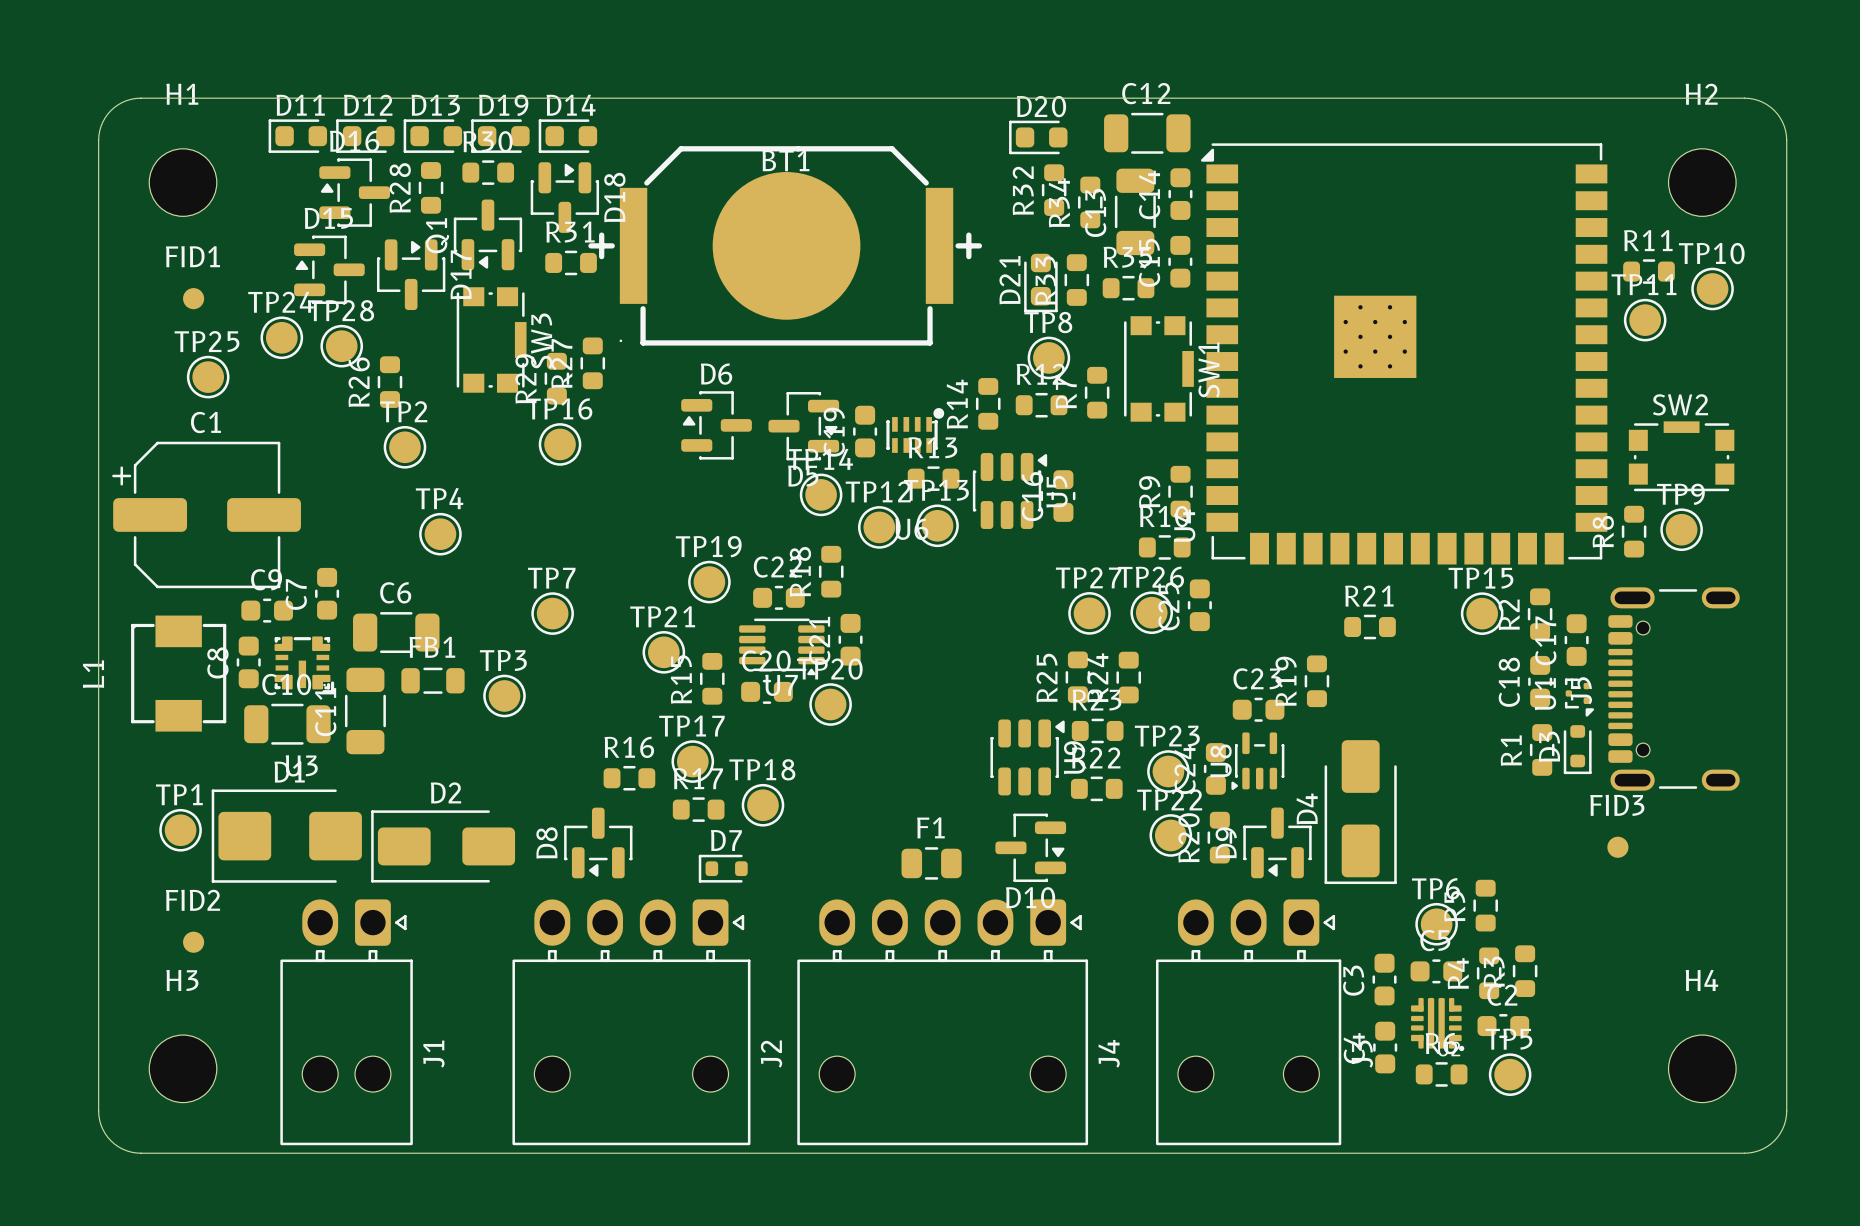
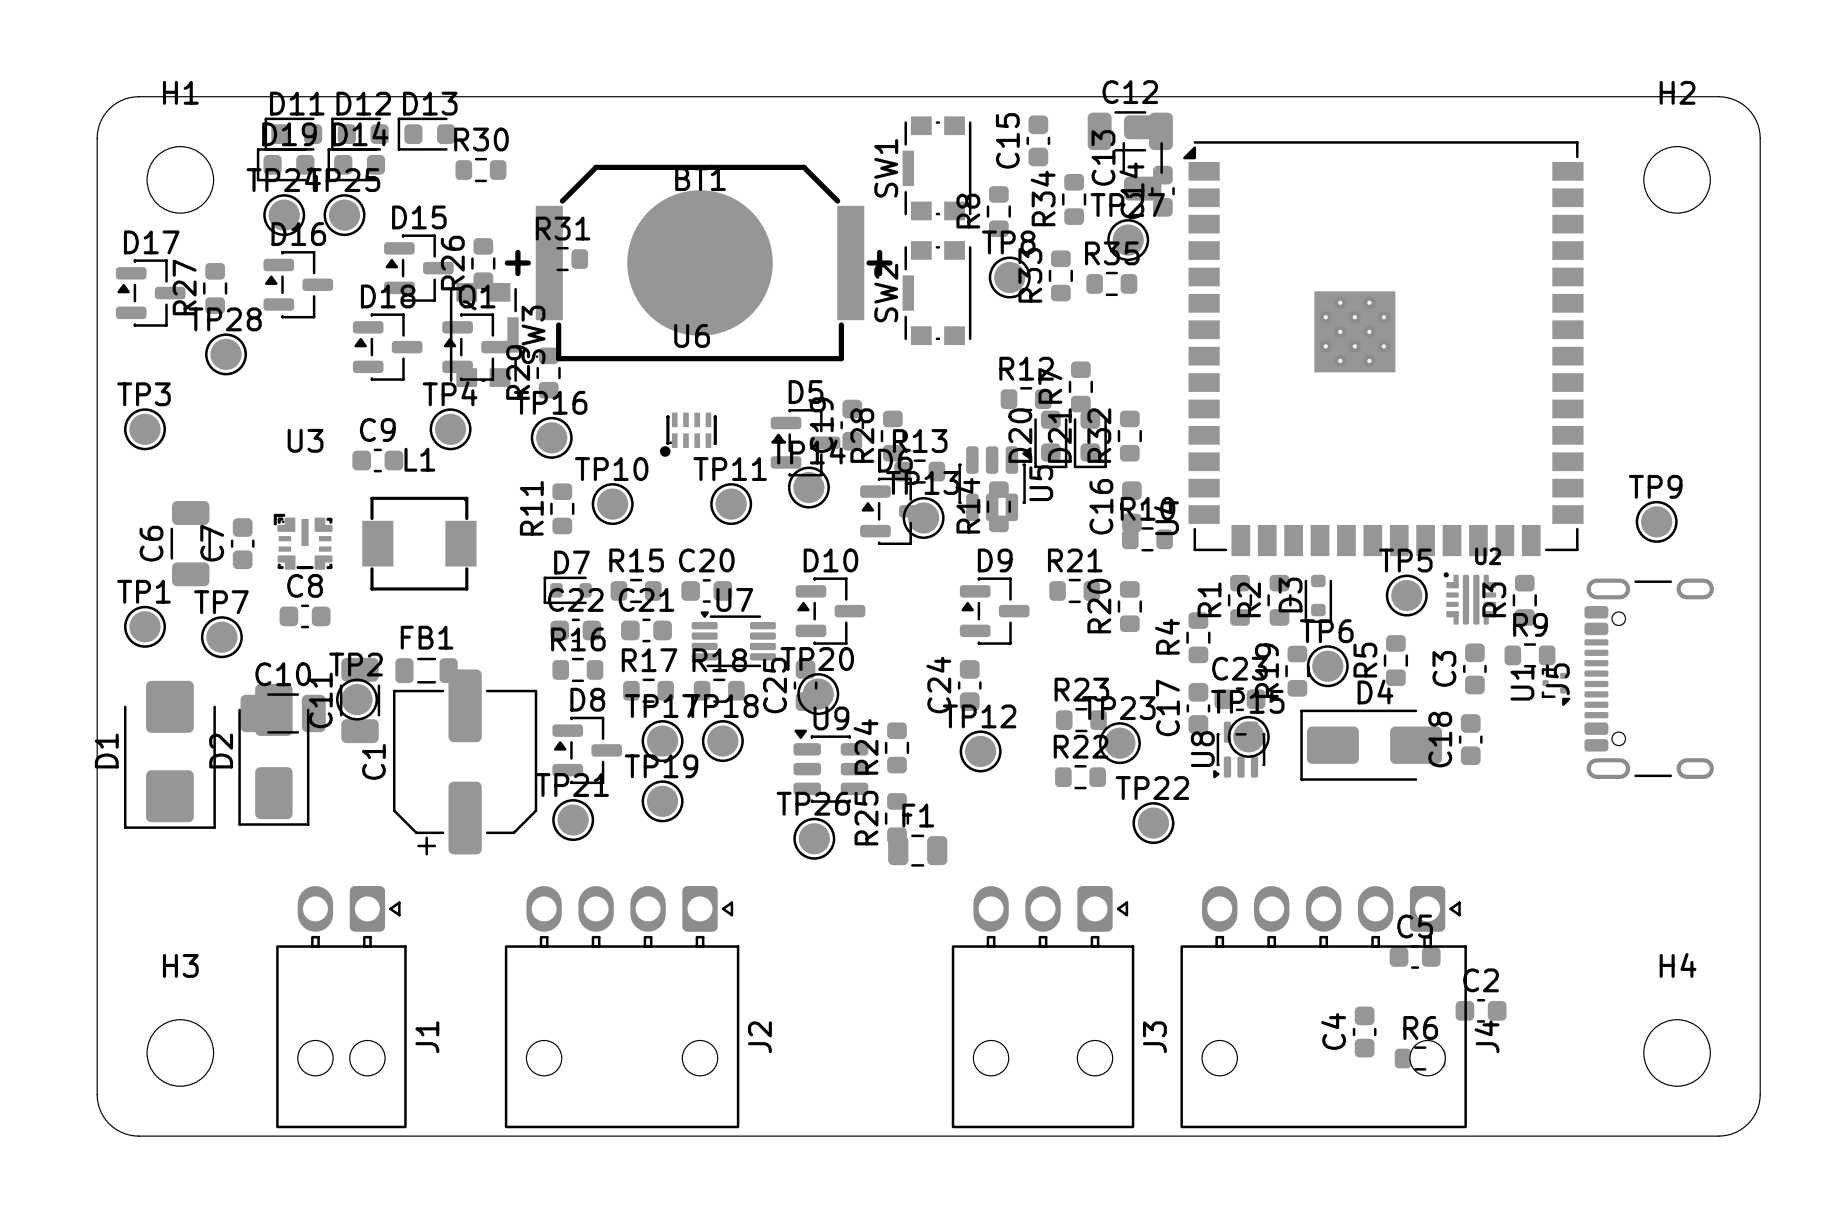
D19 position: (500, 136) -> (285, 164)
D14 position: (567, 136) -> (356, 164)
D20 rotation: 0° (1038, 137) -> 90° counterclockwise (1050, 439)
D20 position: (1038, 137) -> (1050, 439)
R28 position: (431, 187) -> (892, 436)
R32 position: (1054, 190) -> (1129, 436)
D16 position: (354, 192) -> (298, 284)
D18 rotation: 0° (564, 197) -> 90° counterclockwise (387, 347)
D18 position: (564, 197) -> (387, 347)
C13 position: (1135, 211) -> (1142, 157)
Q1 rotation: 0° (487, 234) -> 90° clockwise (477, 347)
Q1 position: (487, 234) -> (477, 347)
R11 name position: R11 (1648, 240) -> R11 (531, 508)
BT1 position: (785, 245) -> (698, 263)
C15 position: (1180, 261) -> (1038, 140)
D15 position: (329, 269) -> (418, 268)
R11 rotation: 0° (1648, 271) -> 90° clockwise (562, 508)
R11 position: (1648, 271) -> (562, 508)
D17 rotation: 0° (411, 274) -> 90° counterclockwise (150, 293)
D17 position: (411, 274) -> (150, 293)
D21 position: (1040, 283) -> (1090, 439)
TP10 position: (1712, 288) -> (612, 504)
FID1: (193, 298) -> none
TP11 position: (1645, 320) -> (731, 504)
TP24 position: (281, 337) -> (284, 215)
TP28 position: (341, 346) -> (226, 354)
TP8 position: (1048, 357) -> (1009, 277)
R27 position: (592, 363) -> (215, 288)
SW1 rotation: 0° (1158, 368) -> 180° (937, 168)
SW1 position: (1158, 368) -> (937, 168)
TP25 position: (208, 377) -> (344, 215)
R26 position: (389, 382) -> (483, 263)
R14 position: (988, 403) -> (998, 506)
C1 name position: C1 (205, 422) -> C1 (373, 761)
D6 position: (716, 425) -> (894, 511)
D5 rotation: 0° (803, 426) -> 180° (805, 442)
U6 rotation: 0° (915, 430) -> 180° (688, 434)
U6 position: (915, 430) -> (688, 434)
C1 footprint: [112, 441, 301, 589] -> [392, 669, 538, 856]
TP2 position: (404, 447) -> (357, 699)
SW2 rotation: 0° (1681, 456) -> 90° counterclockwise (937, 293)
SW2 position: (1681, 456) -> (937, 293)
R9 rotation: 0° (1180, 491) -> 90° clockwise (1529, 655)
R9 position: (1180, 491) -> (1529, 655)
C16 position: (1063, 496) -> (1131, 506)
TP12 position: (879, 527) -> (980, 751)
R8 position: (1634, 531) -> (998, 211)
TP4 position: (440, 534) -> (450, 429)
R18 rotation: 0° (831, 571) -> 90° clockwise (719, 690)
R18 position: (831, 571) -> (719, 690)
TP19 position: (709, 582) -> (662, 801)
C6 name position: C6 (395, 592) -> C6 (151, 543)
C7 position: (327, 593) -> (242, 543)
C22 position: (778, 597) -> (575, 630)
C25 position: (1199, 605) -> (805, 685)
C9 position: (267, 610) -> (377, 460)
TP26 position: (1151, 612) -> (814, 838)
TP7 position: (552, 613) -> (221, 637)
TP27 position: (1089, 613) -> (1128, 240)
TP15 position: (1482, 613) -> (1248, 736)
R2 position: (1540, 614) -> (1279, 600)
R21 position: (1370, 627) -> (1074, 590)
C6 rotation: 0° (396, 632) -> 90° clockwise (190, 543)
C6 position: (396, 632) -> (190, 543)
C21 rotation: 0° (850, 639) -> 90° clockwise (646, 630)
C21 position: (850, 639) -> (646, 630)
C17 position: (1576, 640) -> (1198, 708)
U7 rotation: 0° (781, 646) -> 180° (733, 639)
TP21 position: (663, 652) -> (573, 820)
C8 rotation: 0° (248, 662) -> 90° clockwise (305, 616)
C8 position: (248, 662) -> (305, 616)
U3 rotation: 0° (304, 664) -> 180° (303, 541)
U3 position: (304, 664) -> (303, 541)
L1 rotation: 0° (178, 673) -> 90° clockwise (419, 543)
L1 position: (178, 673) -> (419, 543)
R25 position: (1077, 677) -> (896, 818)
R24 position: (1128, 677) -> (896, 747)
R15 rotation: 0° (712, 678) -> 90° clockwise (636, 590)
R15 position: (712, 678) -> (636, 590)
C18 position: (1540, 681) -> (1470, 739)
C20 position: (766, 691) -> (706, 590)
TP3 position: (504, 695) -> (144, 429)
R1 position: (1542, 749) -> (1239, 600)
D3 position: (1577, 749) -> (1318, 598)
U9 rotation: 0° (1027, 757) -> 90° counterclockwise (830, 766)
U9 position: (1027, 757) -> (830, 766)
TP17 position: (692, 761) -> (662, 741)
C24 position: (1215, 768) -> (969, 685)
TP23 position: (1168, 771) -> (1119, 743)
R16 position: (629, 778) -> (577, 669)
TP18 position: (762, 805) -> (722, 741)
R17 position: (698, 809) -> (648, 690)
D4 rotation: 0° (1360, 812) -> 90° clockwise (1371, 745)
TP1 position: (180, 830) -> (144, 626)
D1 rotation: 0° (286, 836) -> 90° counterclockwise (169, 754)
D1 position: (286, 836) -> (169, 754)
R20 position: (1219, 837) -> (1129, 606)
D8 rotation: 0° (598, 842) -> 90° clockwise (587, 750)
D8 position: (598, 842) -> (587, 750)
D9 rotation: 0° (1277, 842) -> 90° clockwise (994, 611)
D9 position: (1277, 842) -> (994, 611)
D2 rotation: 0° (443, 846) -> 90° counterclockwise (273, 754)
D2 position: (443, 846) -> (273, 754)
D10 rotation: 0° (1030, 847) -> 180° (830, 611)
D10 position: (1030, 847) -> (830, 611)
FID3: (1617, 847) -> none
D7 position: (723, 868) -> (567, 590)
R5 position: (1485, 905) -> (1395, 660)
TP6 position: (1436, 924) -> (1327, 666)
FID2: (193, 942) -> none
R3 position: (1525, 971) -> (1524, 600)
R4 position: (1489, 973) -> (1198, 637)
C3 position: (1384, 979) -> (1474, 668)
J4 position: (942, 1022) -> (1323, 1007)
J3 position: (1248, 1022) -> (1043, 1007)
U2 rotation: 0° (1437, 1024) -> 180° (1469, 598)
U2 position: (1437, 1024) -> (1469, 598)
TP5 position: (1510, 1074) -> (1406, 595)

